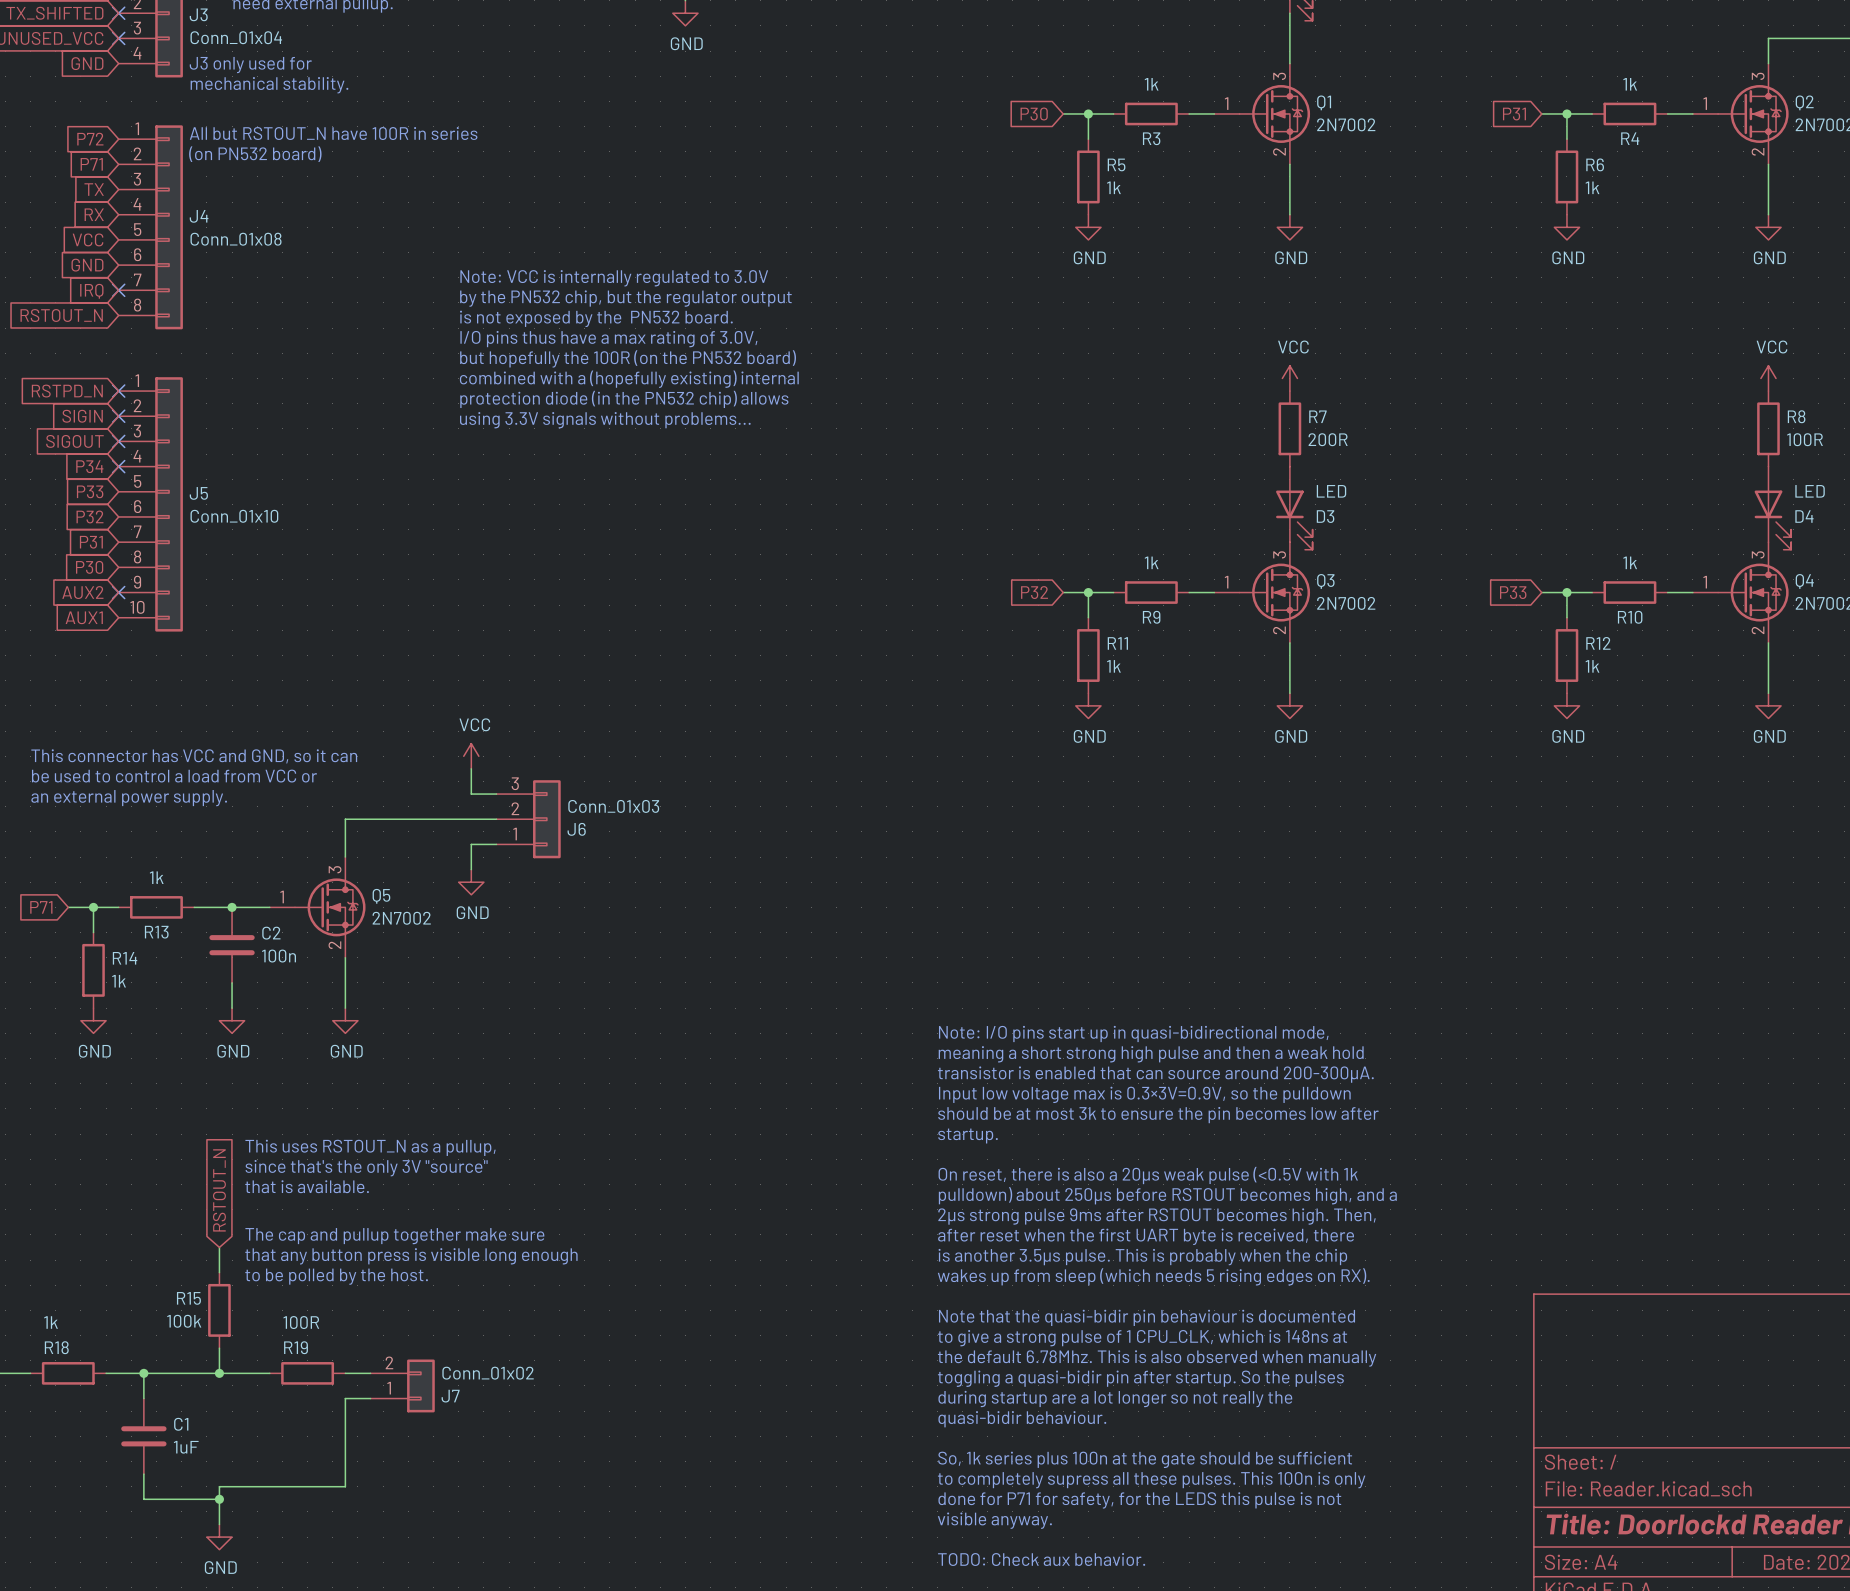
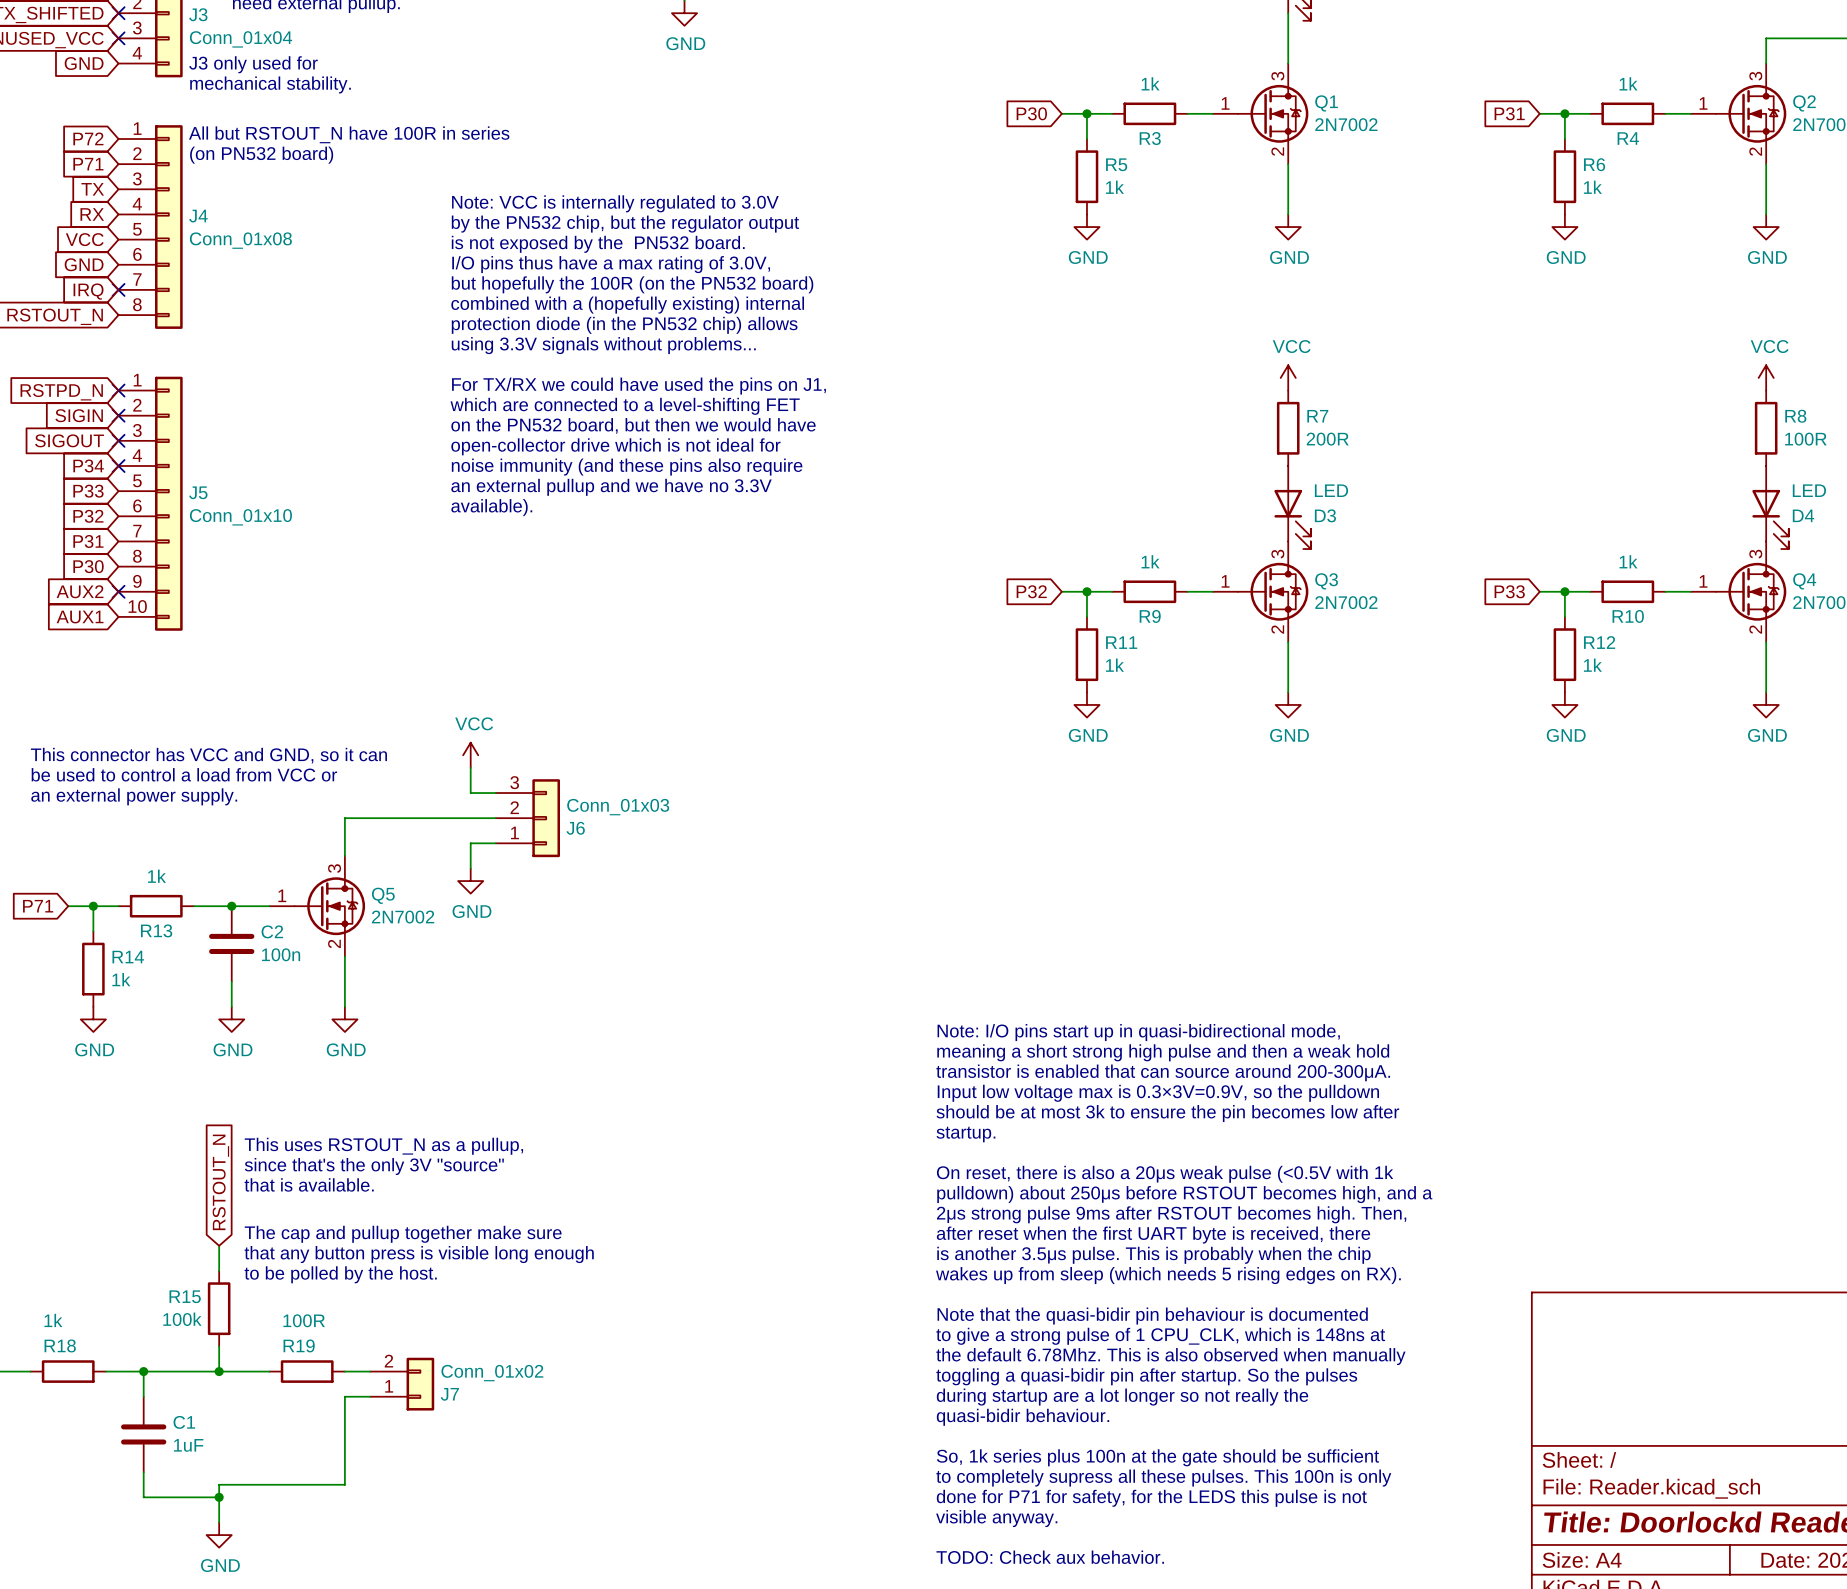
text position: Note: VCC is internally regulated to 3.0V (614, 278) -> Note: VCC is internally regulated to 3.0V (615, 203)
text position: by the PN532 chip, but the regulator output (625, 298) -> by the PN532 chip, but the regulator output (625, 224)
text position: is not exposed by the PN532 board. (596, 318) -> is not exposed by the PN532 board. (598, 244)
text position: I/O pins thus have a max rating of 3.0V, (608, 339) -> I/O pins thus have a max rating of 3.0V, (611, 264)
text position: but hopefully the 100R (on the PN532 board) (628, 358) -> but hopefully the 100R (on the PN532 board) (632, 284)
text position: combined with a (hopefully existing) internal (629, 379) -> combined with a (hopefully existing) internal (627, 305)
text: none -> For TX/RX we could have used the pins on J1, (639, 386)
text position: protection diode (in the PN532 chip) allows (624, 399) -> protection diode (in the PN532 chip) allows (624, 325)
text: none -> which are connected to a level-shifting FET (625, 406)
text position: using 3.3V signals without problems... (605, 420) -> using 3.3V signals without problems... (603, 345)
text: none -> on the PN532 board, but then we would have (633, 425)
text: none -> open-collector drive which is not ideal for (615, 446)
text: none -> noise immunity (and these pins also require (627, 467)
text: none -> an external pullup and we have no 3.3V (611, 487)
text: none -> available). (491, 507)

